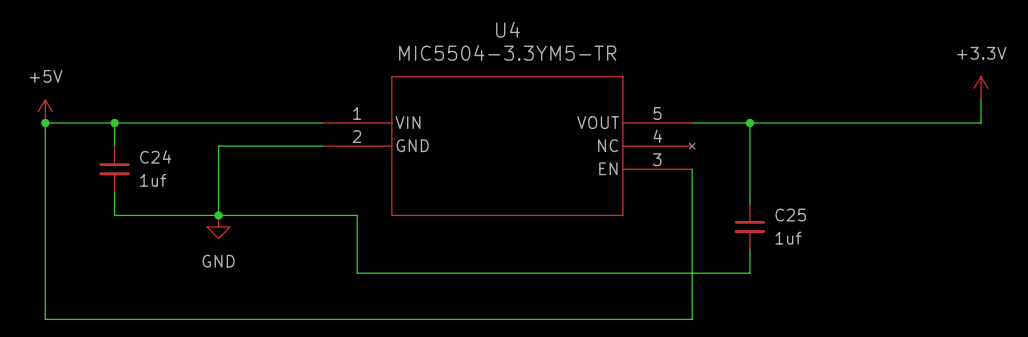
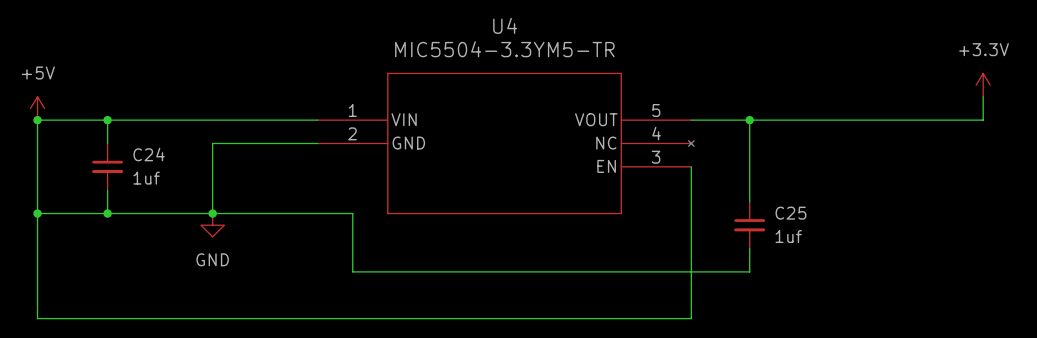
wire: none -> (37, 213) (107, 213)
junction: none -> (37, 213)
junction: none -> (107, 213)

